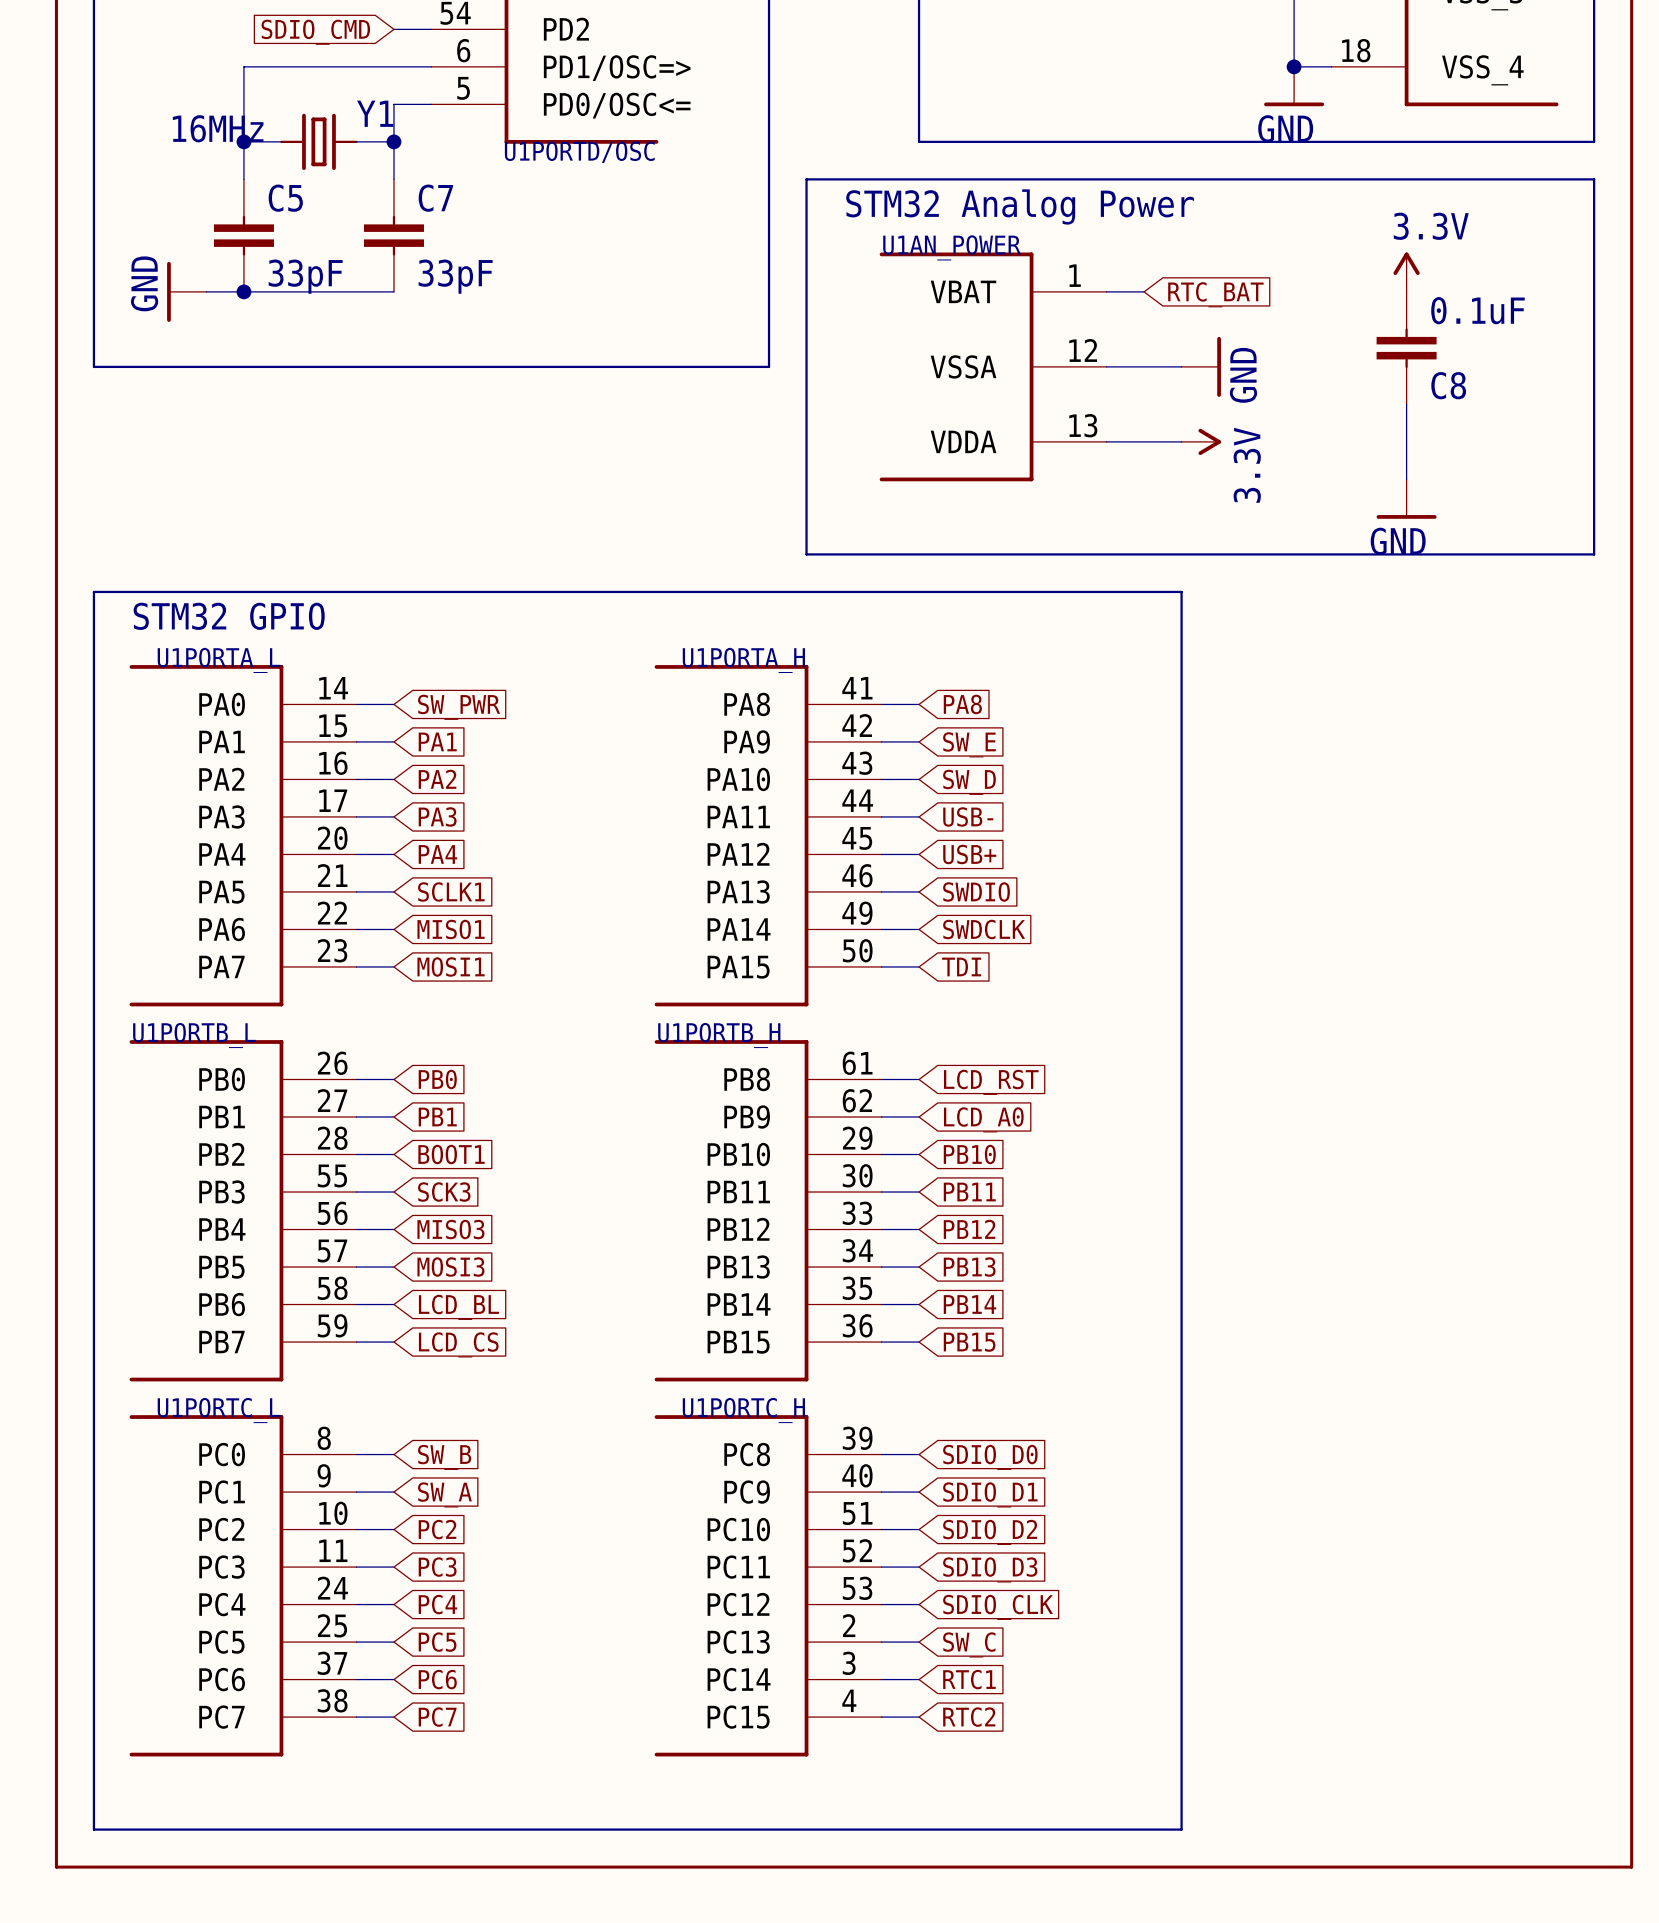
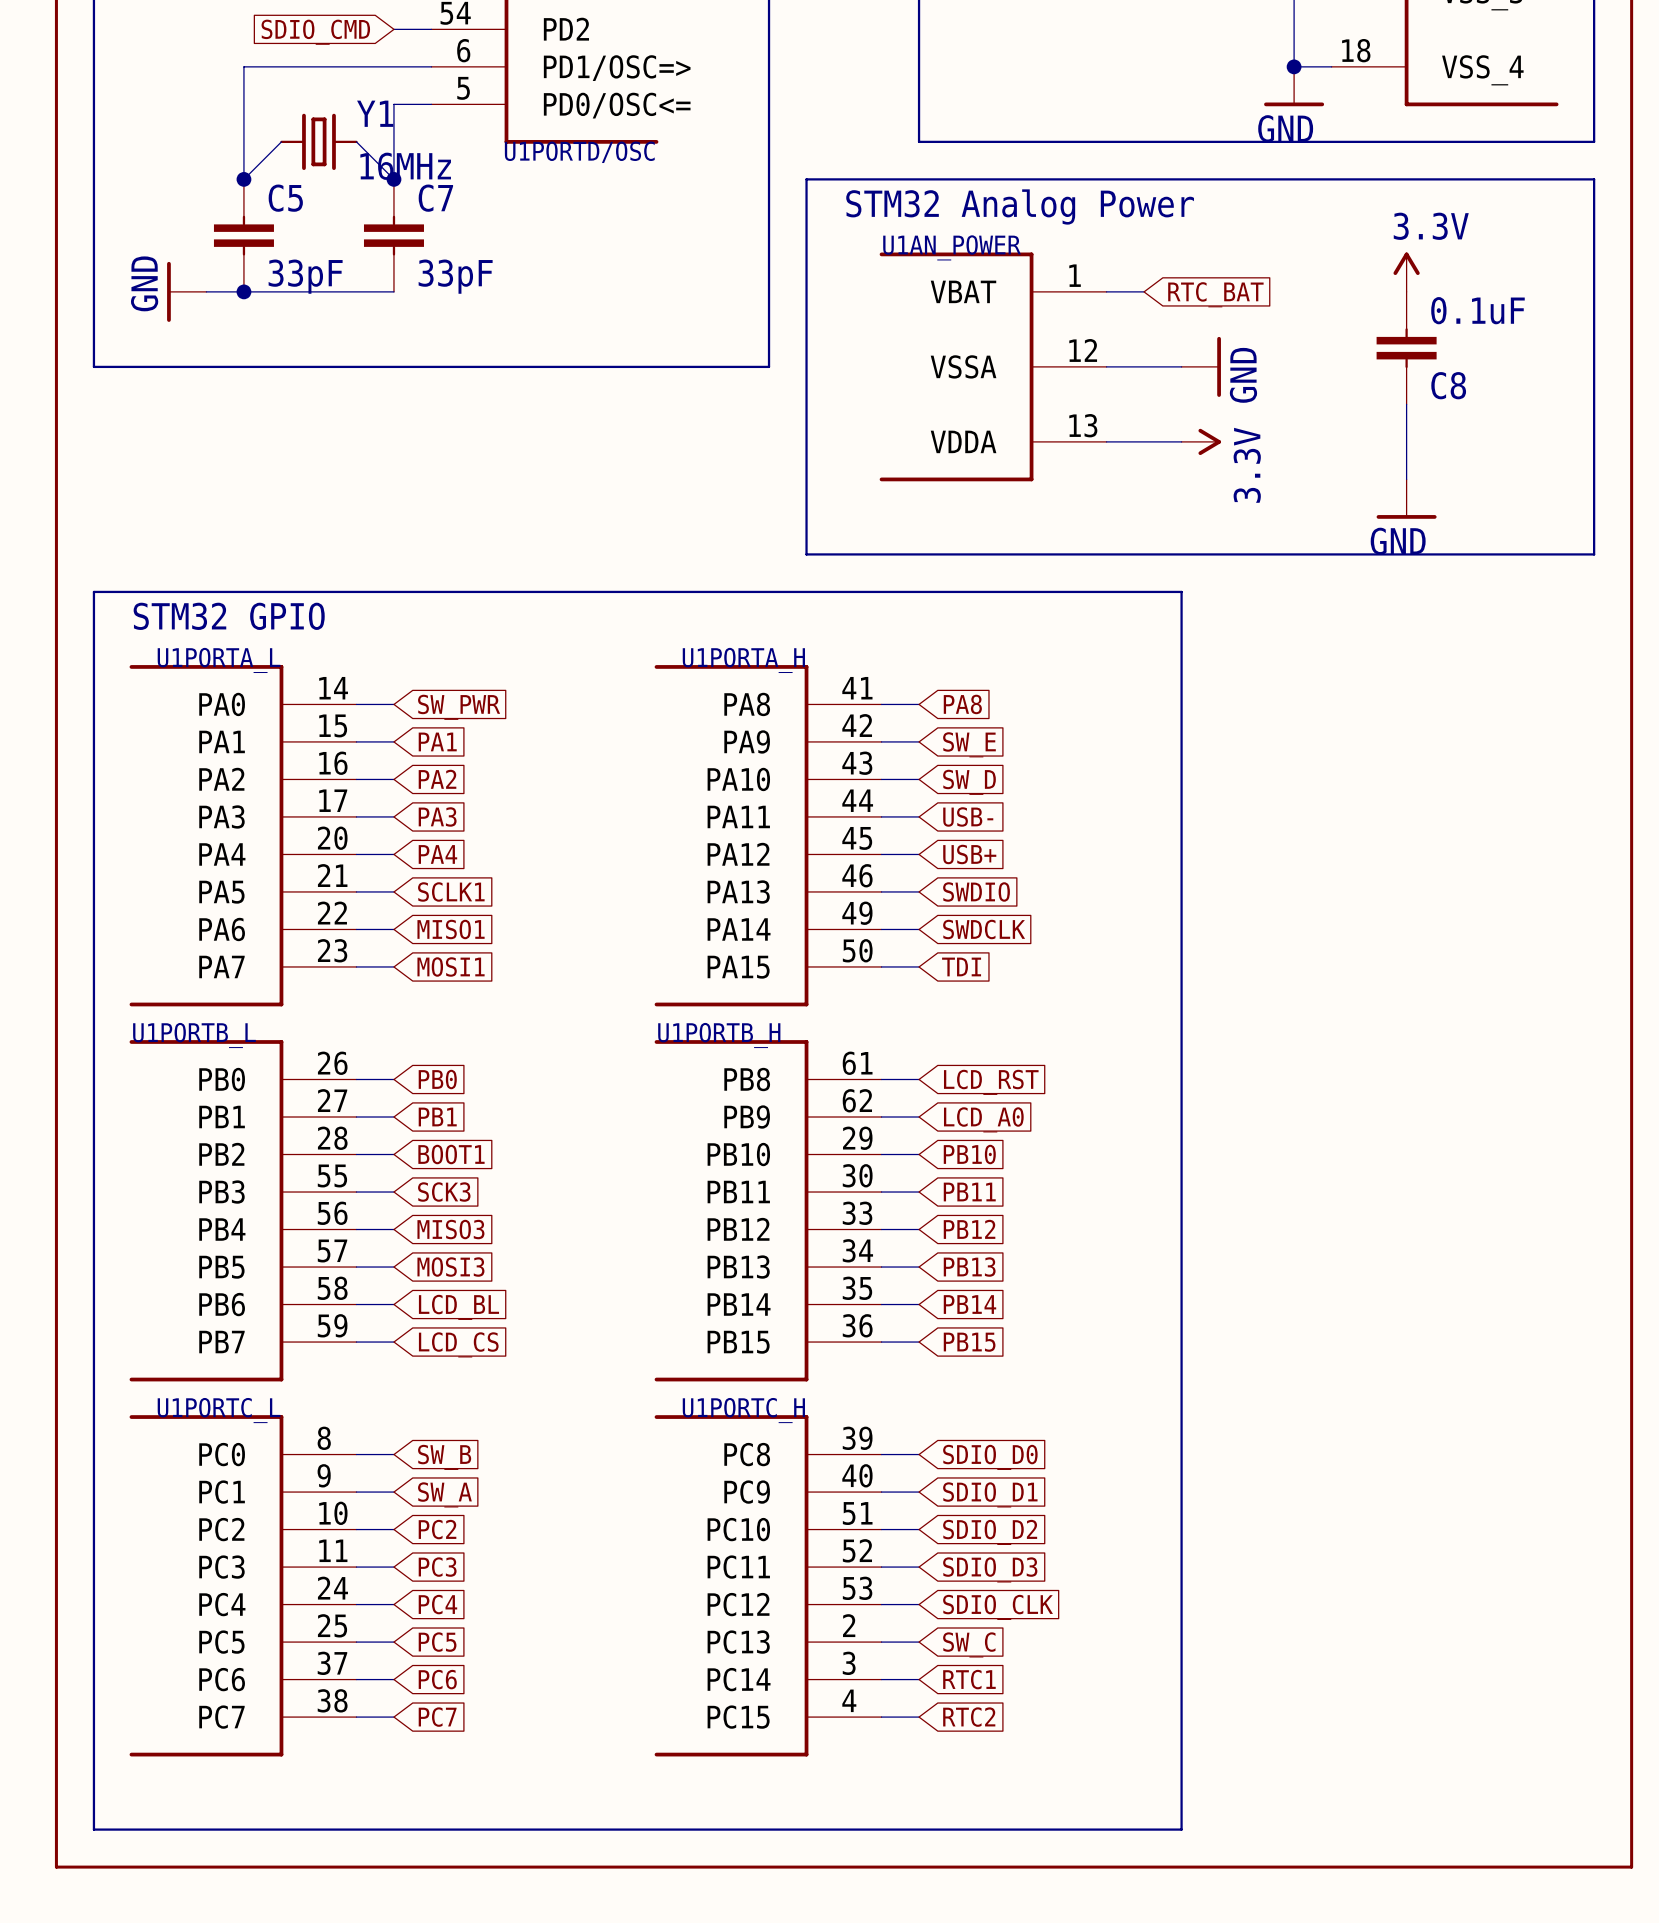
Y1 value position: 16MHz (218, 128) -> 16MHz (405, 166)
wire: (243, 141) (281, 141) -> (243, 179) (281, 141)
junction position: (243, 141) -> (243, 179)
wire: (356, 141) (393, 141) -> (356, 141) (393, 179)
junction position: (393, 141) -> (393, 179)

